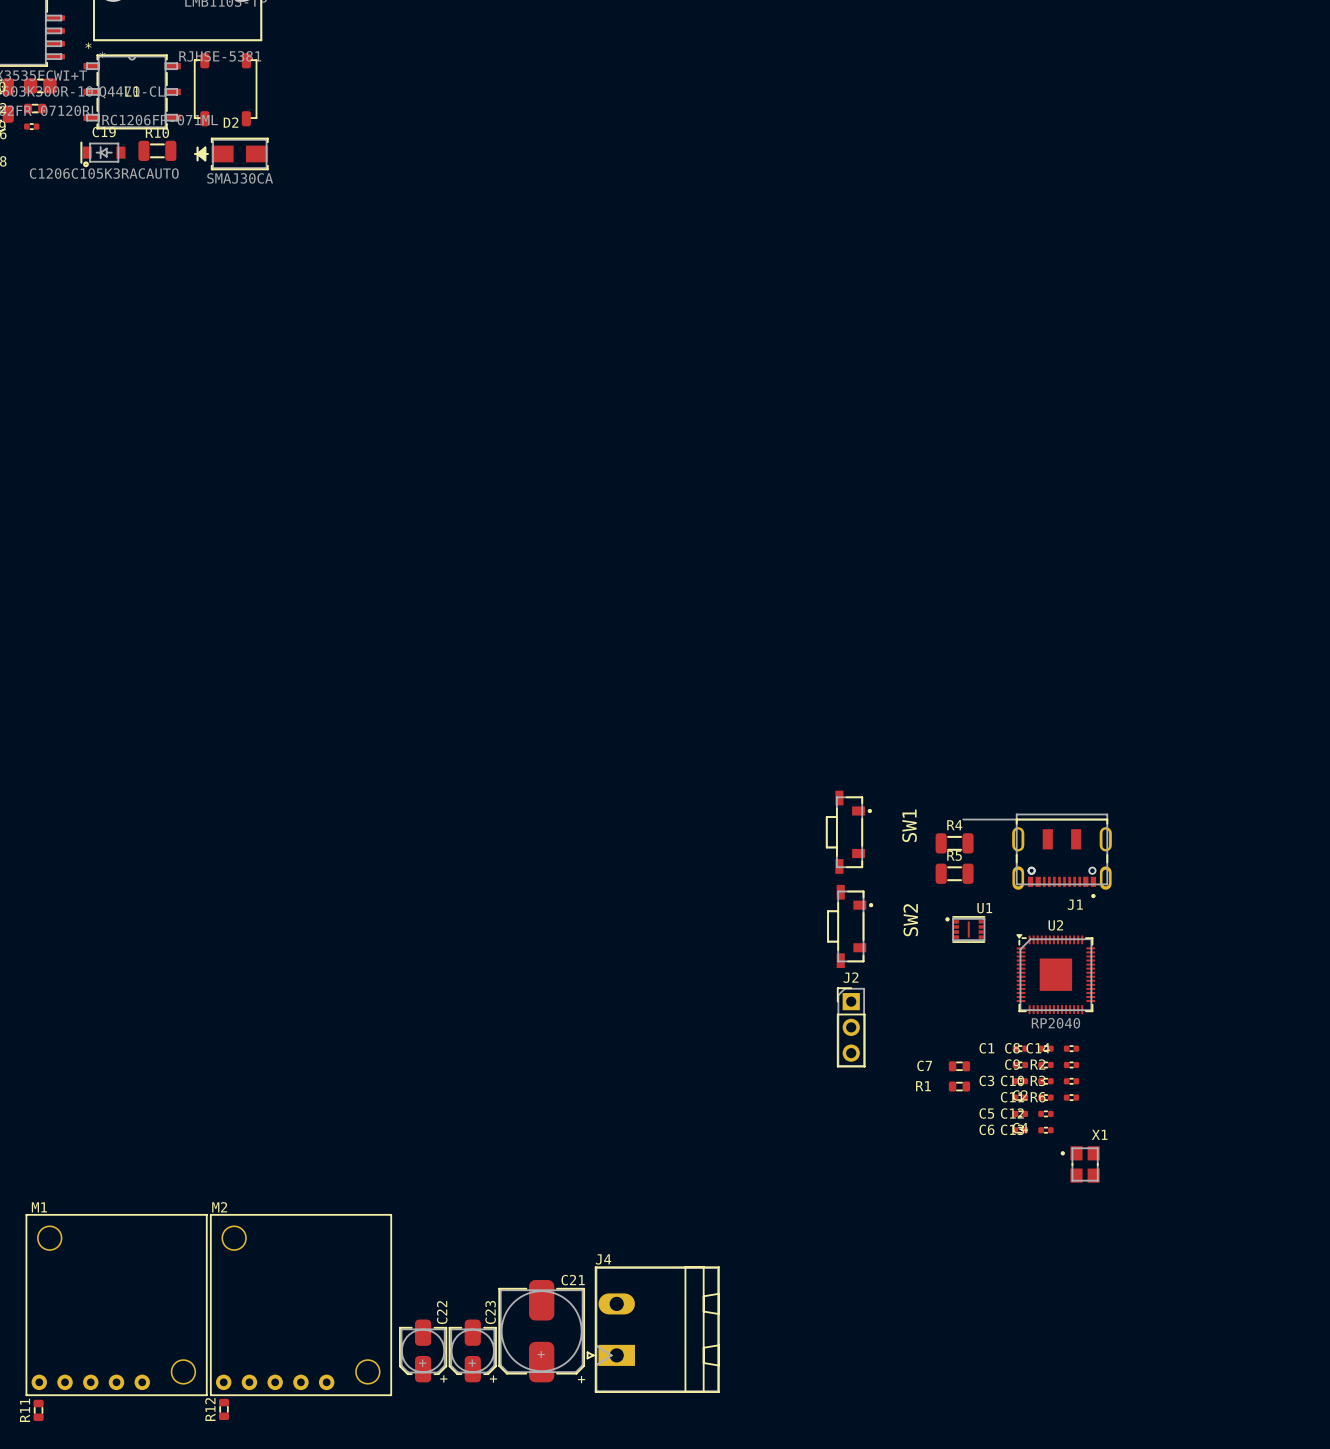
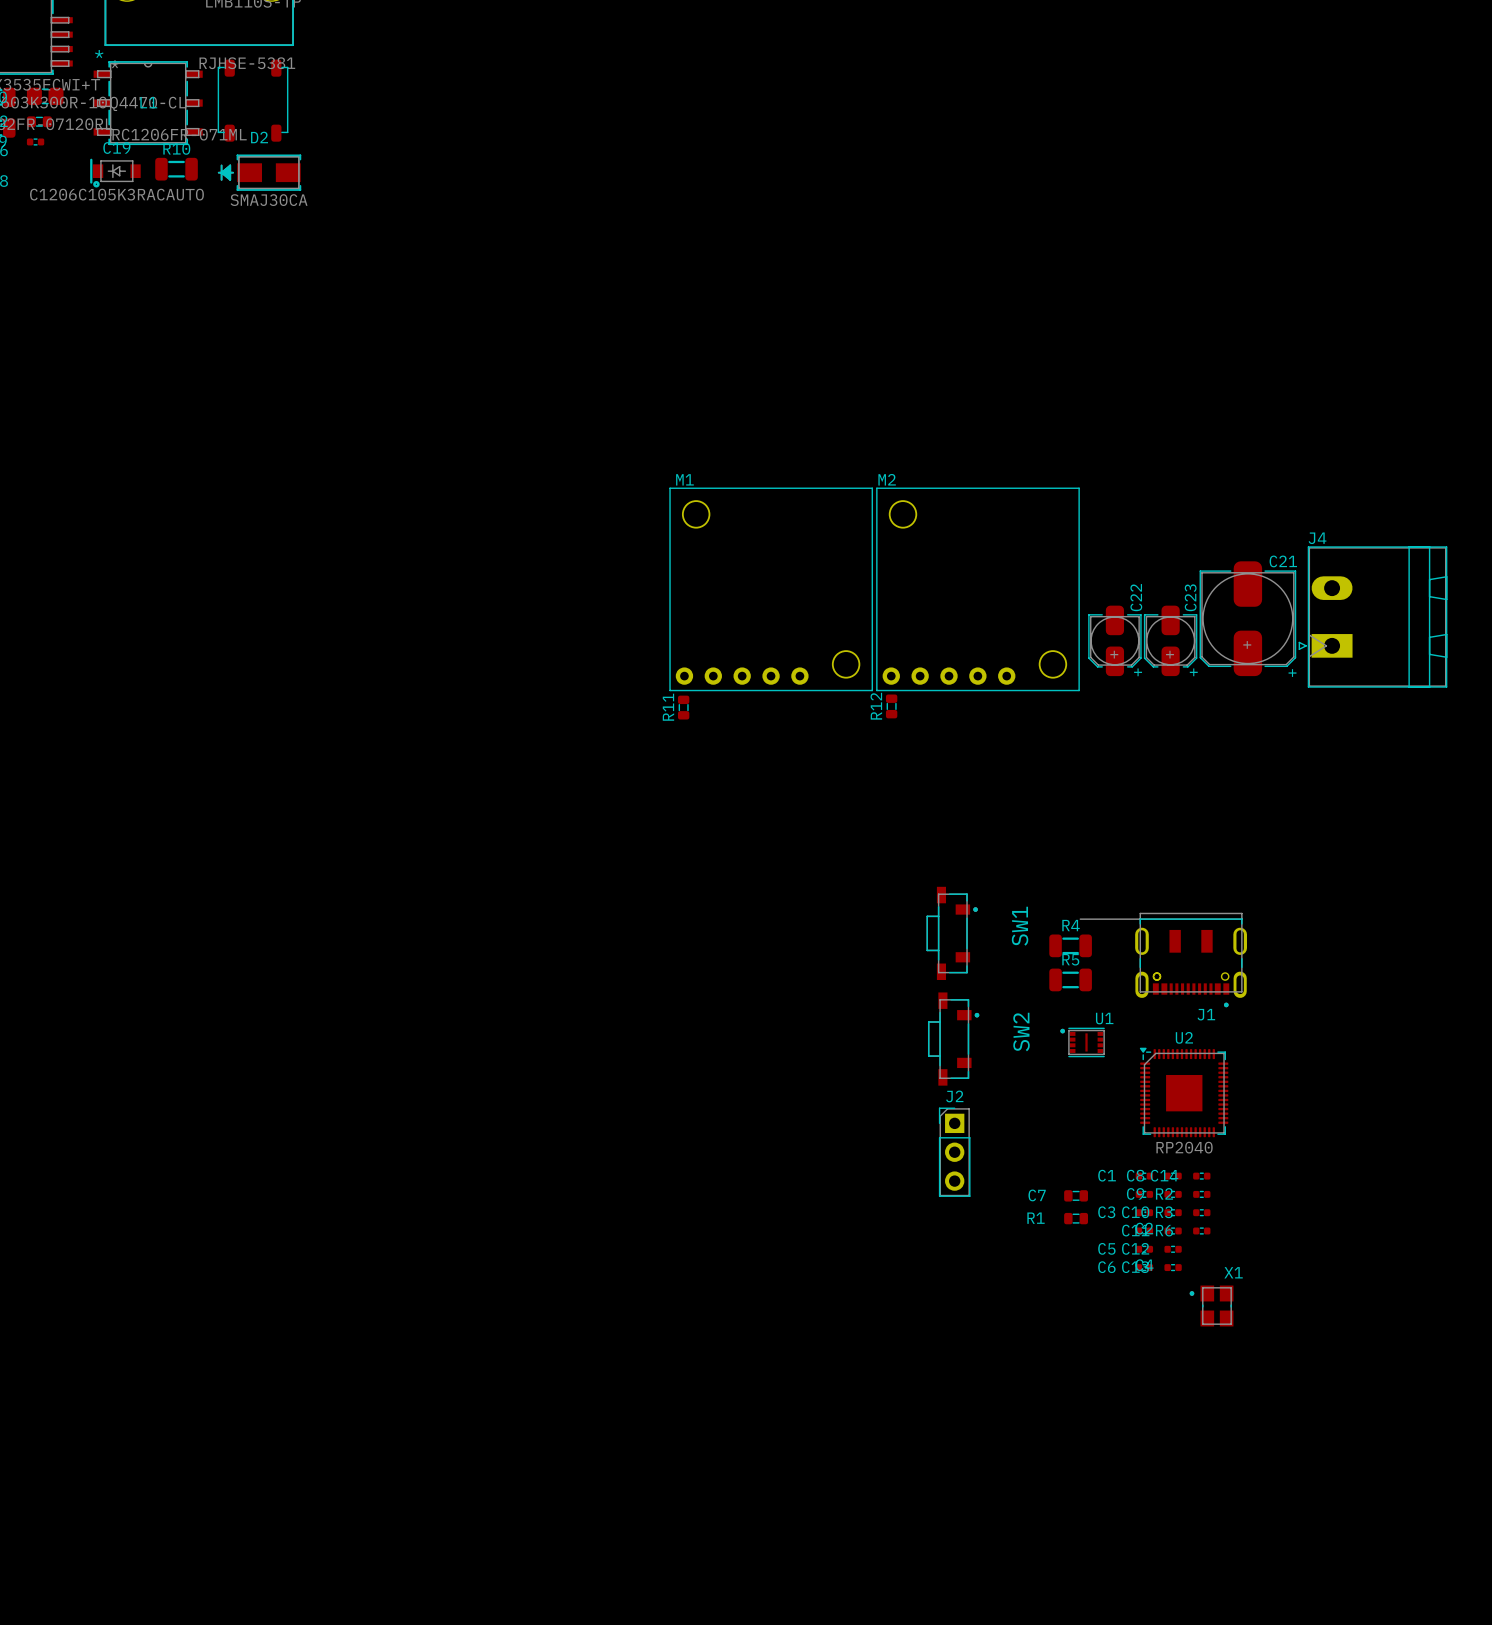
M1 position: (116, 1305) -> (771, 589)
M2 position: (301, 1305) -> (977, 589)
J4 position: (653, 1329) -> (1372, 617)
C21 position: (541, 1331) -> (1247, 618)
C22 position: (423, 1350) -> (1114, 640)
C23 position: (472, 1350) -> (1170, 640)
R12 position: (224, 1409) -> (891, 706)
R11 position: (38, 1410) -> (683, 707)

